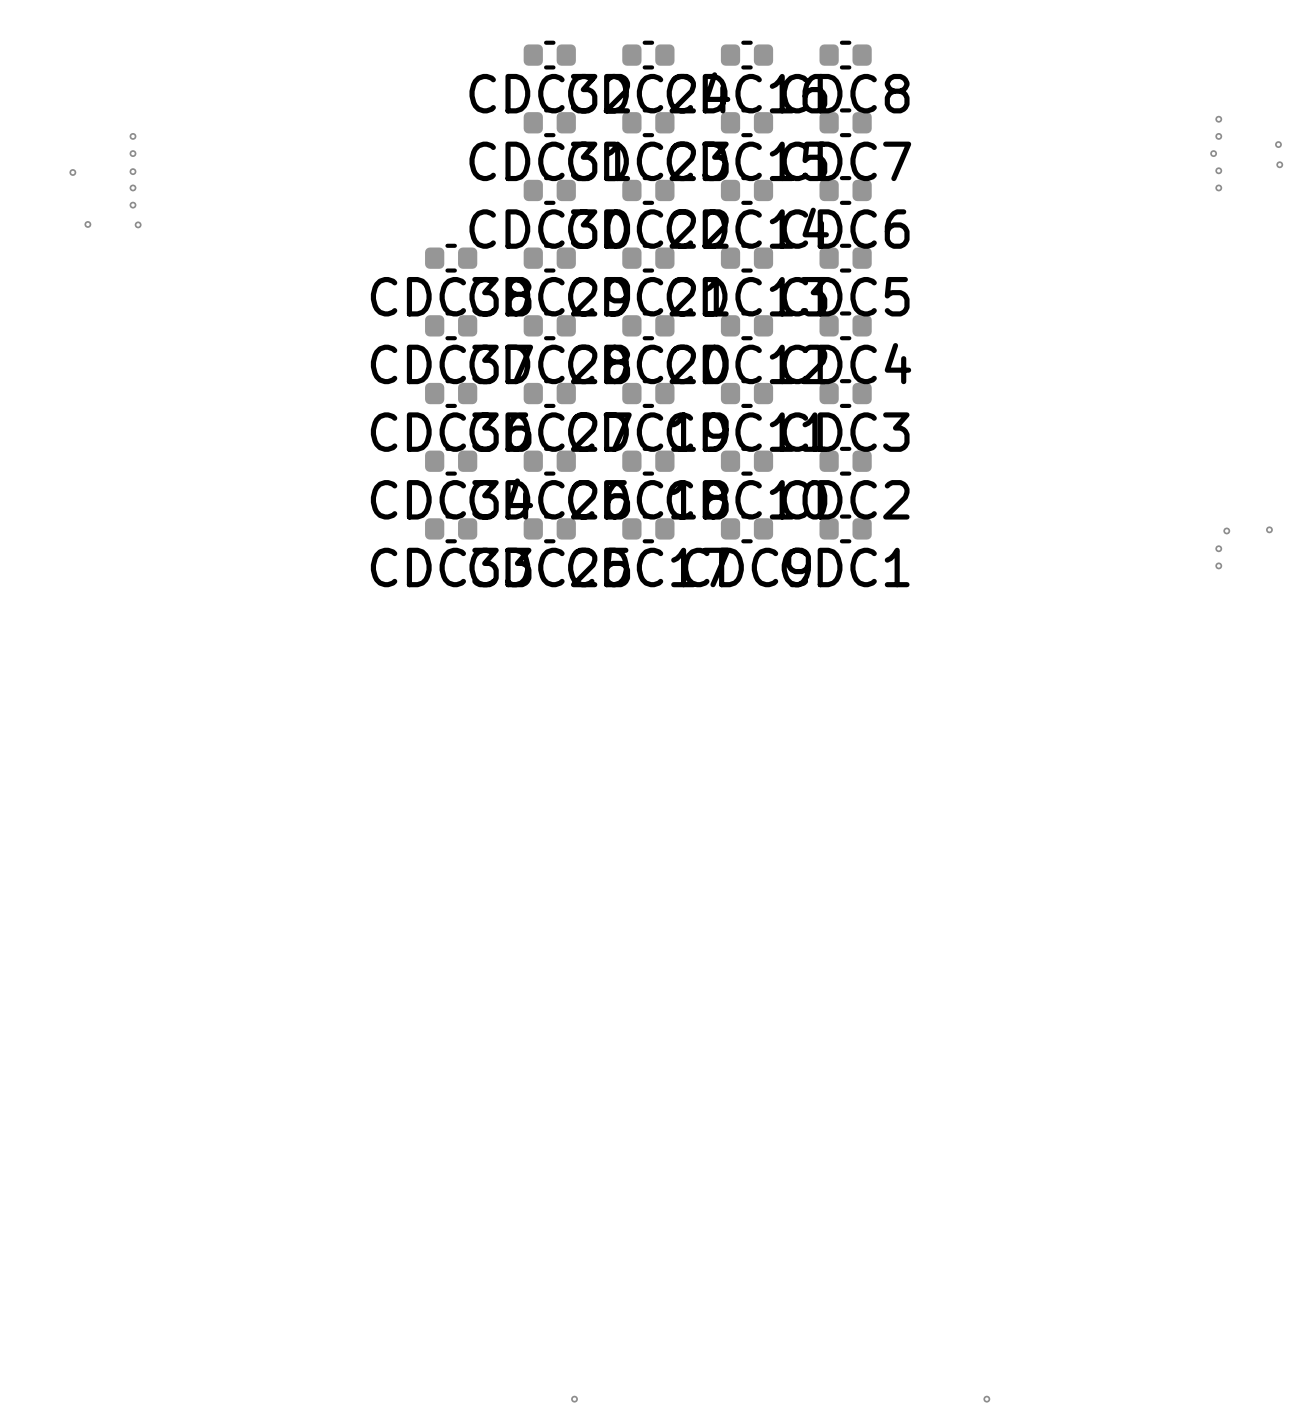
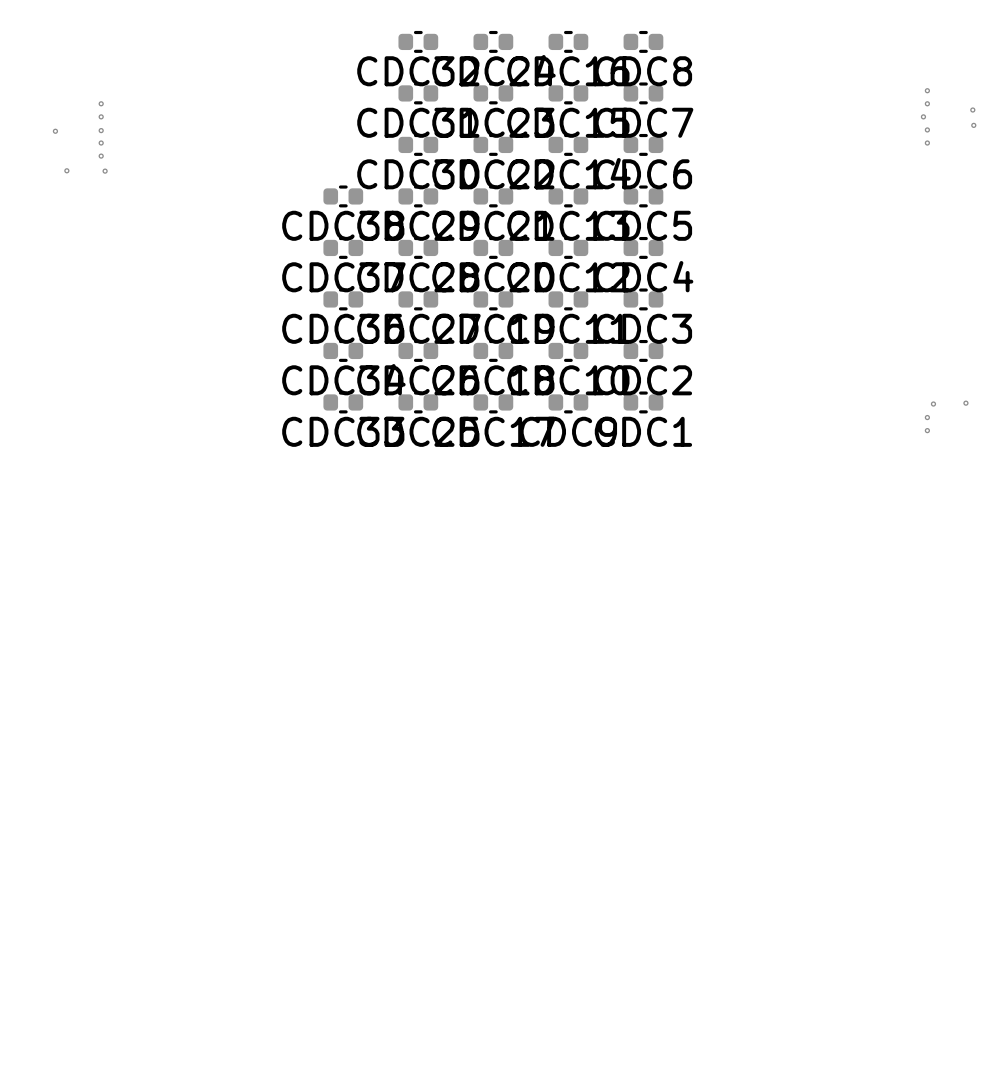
via: (574, 1399) -> none
via: (986, 1399) -> none

